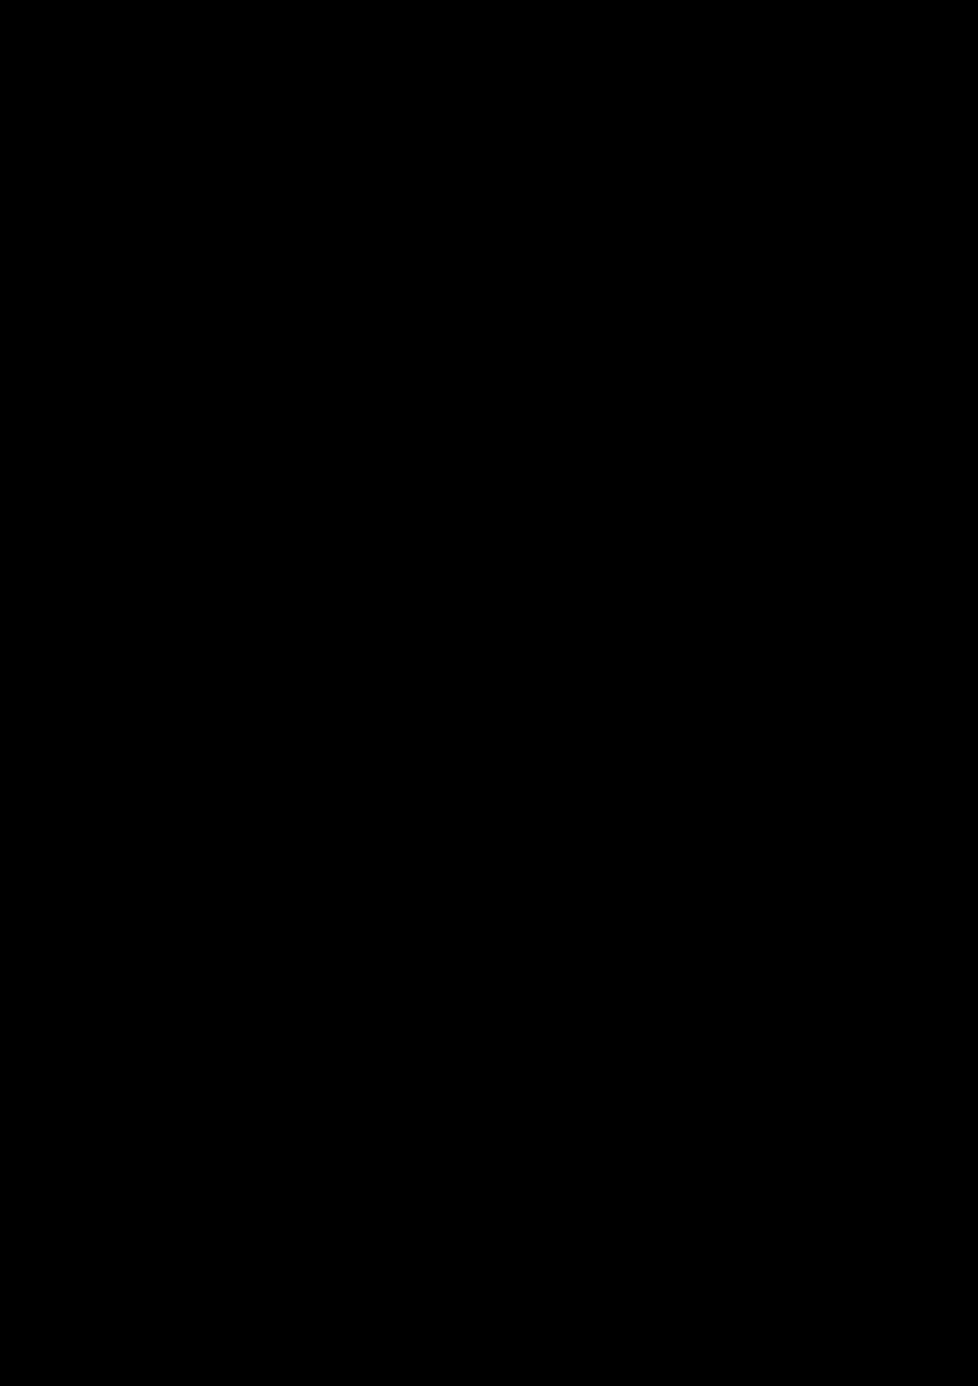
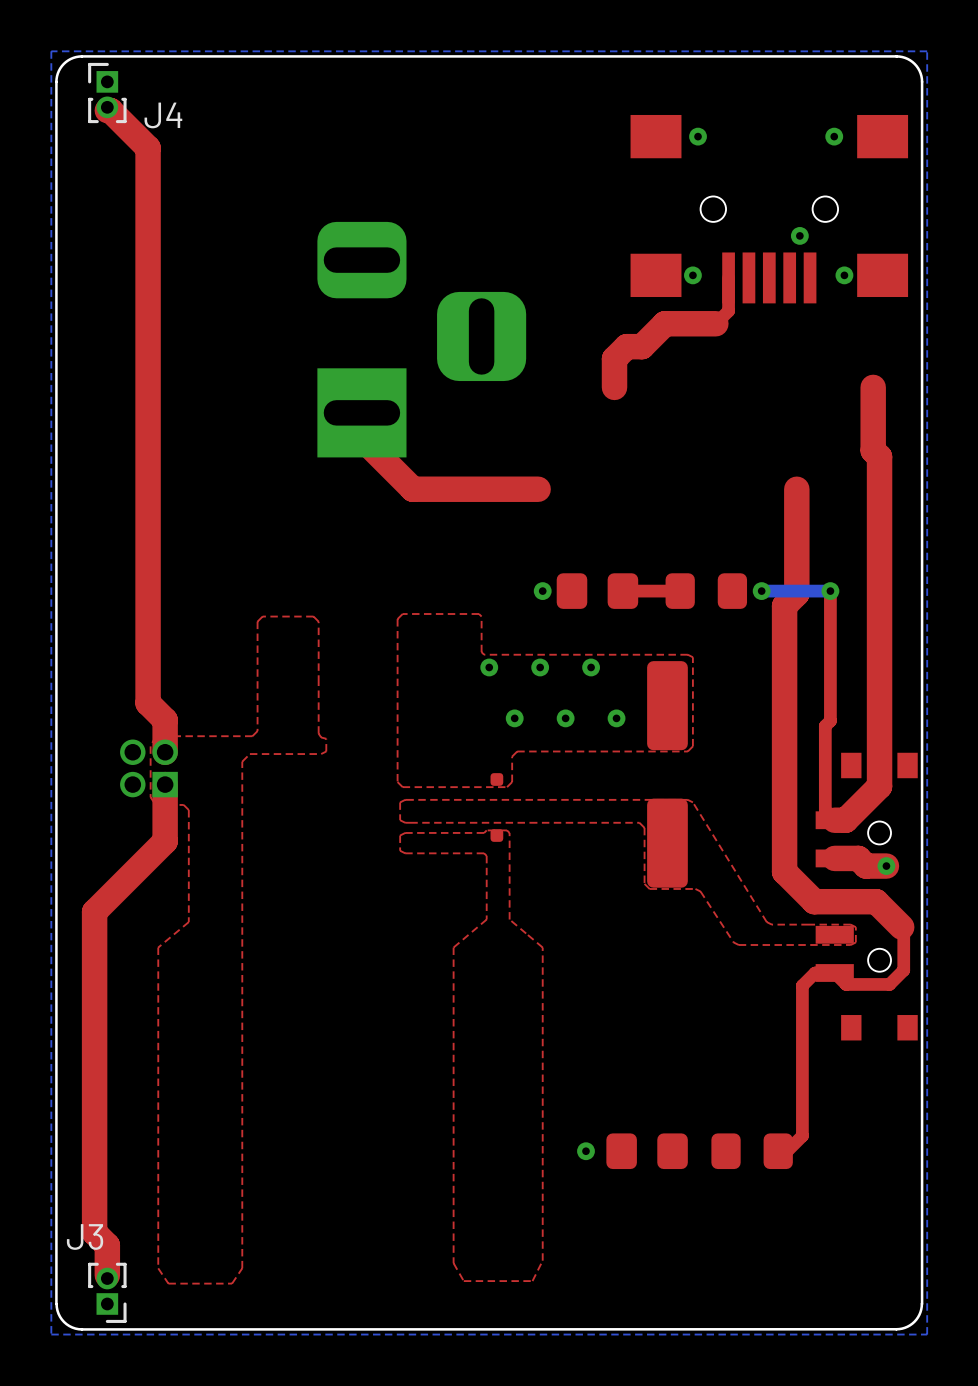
bottom zone outline: none -> (927, 51) (51, 51) (51, 1334) (927, 1334) (927, 51)
J4: none -> (107, 93)
top track: none -> (107, 110) (110, 110) (148, 148) (148, 703) (165, 720) (165, 752)
via: none -> (698, 136)
via: none -> (834, 136)
part: none -> (769, 209)
via: none -> (799, 235)
via: none -> (692, 275)
via: none -> (844, 275)
top track: none -> (728, 277) (728, 311) (715, 323) (664, 323) (642, 346) (626, 346) (614, 358) (614, 387)
part: none -> (421, 339)
top track: none -> (873, 387) (873, 450) (879, 456) (879, 786) (845, 820) (834, 820) (825, 810) (825, 726) (830, 720) (830, 591)
top track: none -> (361, 412) (361, 438) (412, 489) (538, 489)
top track: none -> (796, 489) (796, 593) (784, 605) (784, 871) (814, 901) (876, 901) (903, 929) (903, 970) (889, 984) (846, 984) (834, 973) (815, 973) (802, 985) (802, 1135) (787, 1151) (778, 1151)
via: none -> (542, 591)
part: none -> (597, 591)
top track: none -> (680, 591) (622, 591)
part: none -> (706, 591)
via: none -> (761, 591)
bottom track: none -> (830, 591) (761, 591)
via: none -> (830, 591)
top zone outline: none -> (479, 614) (481, 616) (481, 652) (484, 654) (687, 654) (692, 657) (692, 746) (687, 751) (517, 751) (512, 756) (512, 782) (507, 787) (402, 787) (397, 782) (397, 619) (402, 614) (479, 614)
top zone outline: none -> (313, 616) (318, 621) (318, 733) (321, 737) (326, 738) (326, 751) (321, 754) (249, 754) (242, 761) (242, 1268) (232, 1283) (168, 1283) (158, 1268) (158, 947) (188, 922) (188, 810) (183, 804) (155, 804) (150, 797) (150, 746) (155, 736) (252, 736) (257, 731) (257, 621) (262, 616) (313, 616)
via: none -> (489, 667)
via: none -> (540, 667)
via: none -> (591, 667)
via: none -> (514, 718)
via: none -> (565, 718)
via: none -> (616, 718)
part: none -> (148, 768)
part: none -> (667, 774)
top track: none -> (165, 784) (165, 841) (94, 911) (94, 1232) (107, 1245) (107, 1275)
top zone outline: none -> (687, 799) (692, 802) (766, 922) (771, 924) (850, 924) (855, 927) (855, 942) (850, 944) (738, 944) (733, 942) (700, 891) (695, 888) (649, 888) (644, 883) (644, 827) (639, 822) (405, 822) (400, 820) (400, 802) (405, 799) (687, 799)
part: none -> (496, 807)
top zone outline: none -> (507, 830) (509, 832) (509, 919) (542, 947) (542, 1260) (532, 1281) (463, 1281) (453, 1263) (453, 947) (486, 919) (486, 855) (484, 853) (405, 853) (400, 850) (400, 835) (405, 832) (484, 832) (486, 830) (507, 830)
top track: none -> (834, 858) (858, 858) (866, 866) (886, 866)
via: none -> (886, 866)
part: none -> (866, 896)
via: none -> (585, 1151)
part: none -> (647, 1151)
part: none -> (752, 1151)
J3: none -> (107, 1292)
board edge: none -> (56, 1303) (58, 1313) (64, 1321) (72, 1327) (82, 1329)
board edge: none -> (921, 1303) (919, 1314) (914, 1321) (904, 1327) (896, 1329) (81, 1329)
board edge: none -> (922, 1303) (922, 81) (920, 73) (914, 63) (907, 58) (896, 56) (81, 56) (70, 58) (60, 68) (56, 81) (56, 1303)

